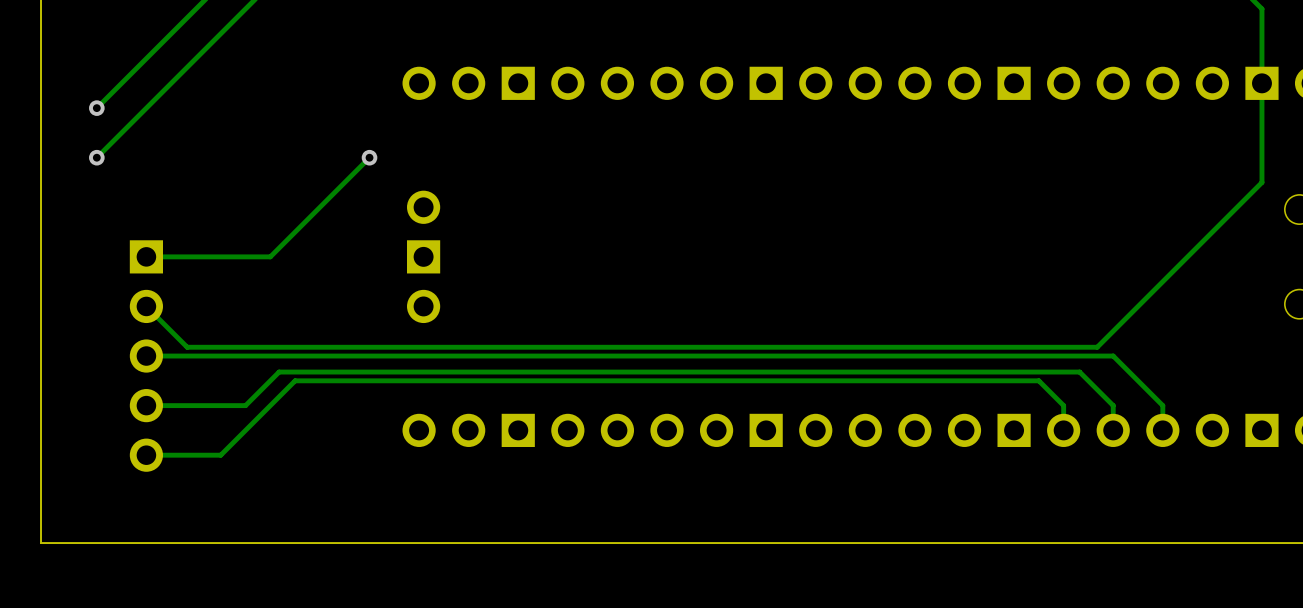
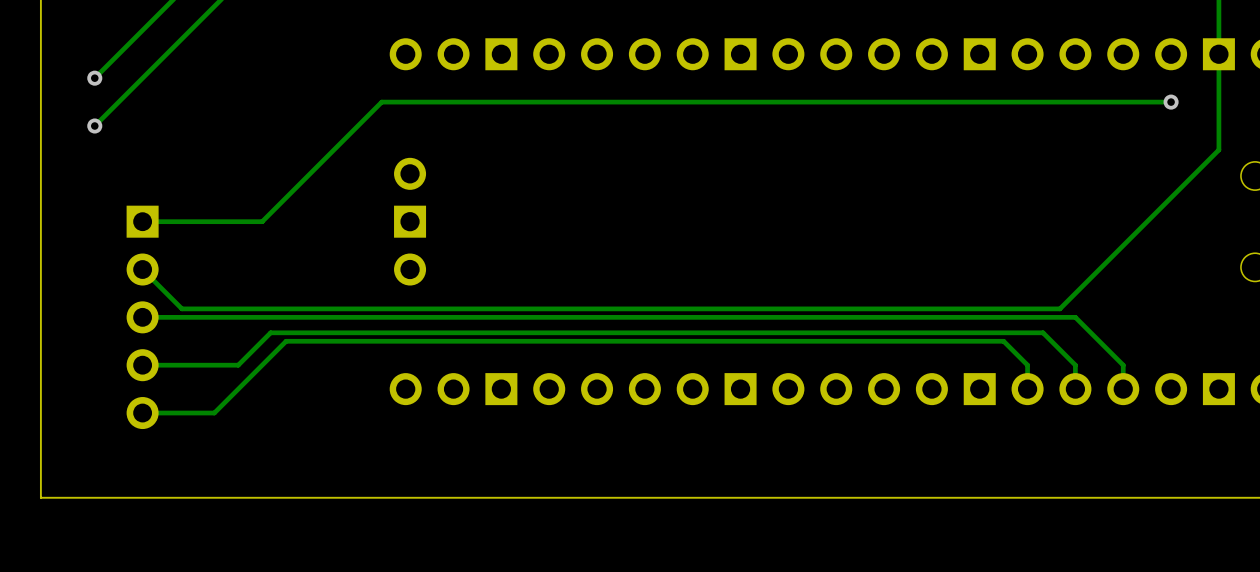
track: none -> (1171, 102) (381, 102) (357, 126)
via: none -> (1171, 102)
via: (369, 157) -> none

